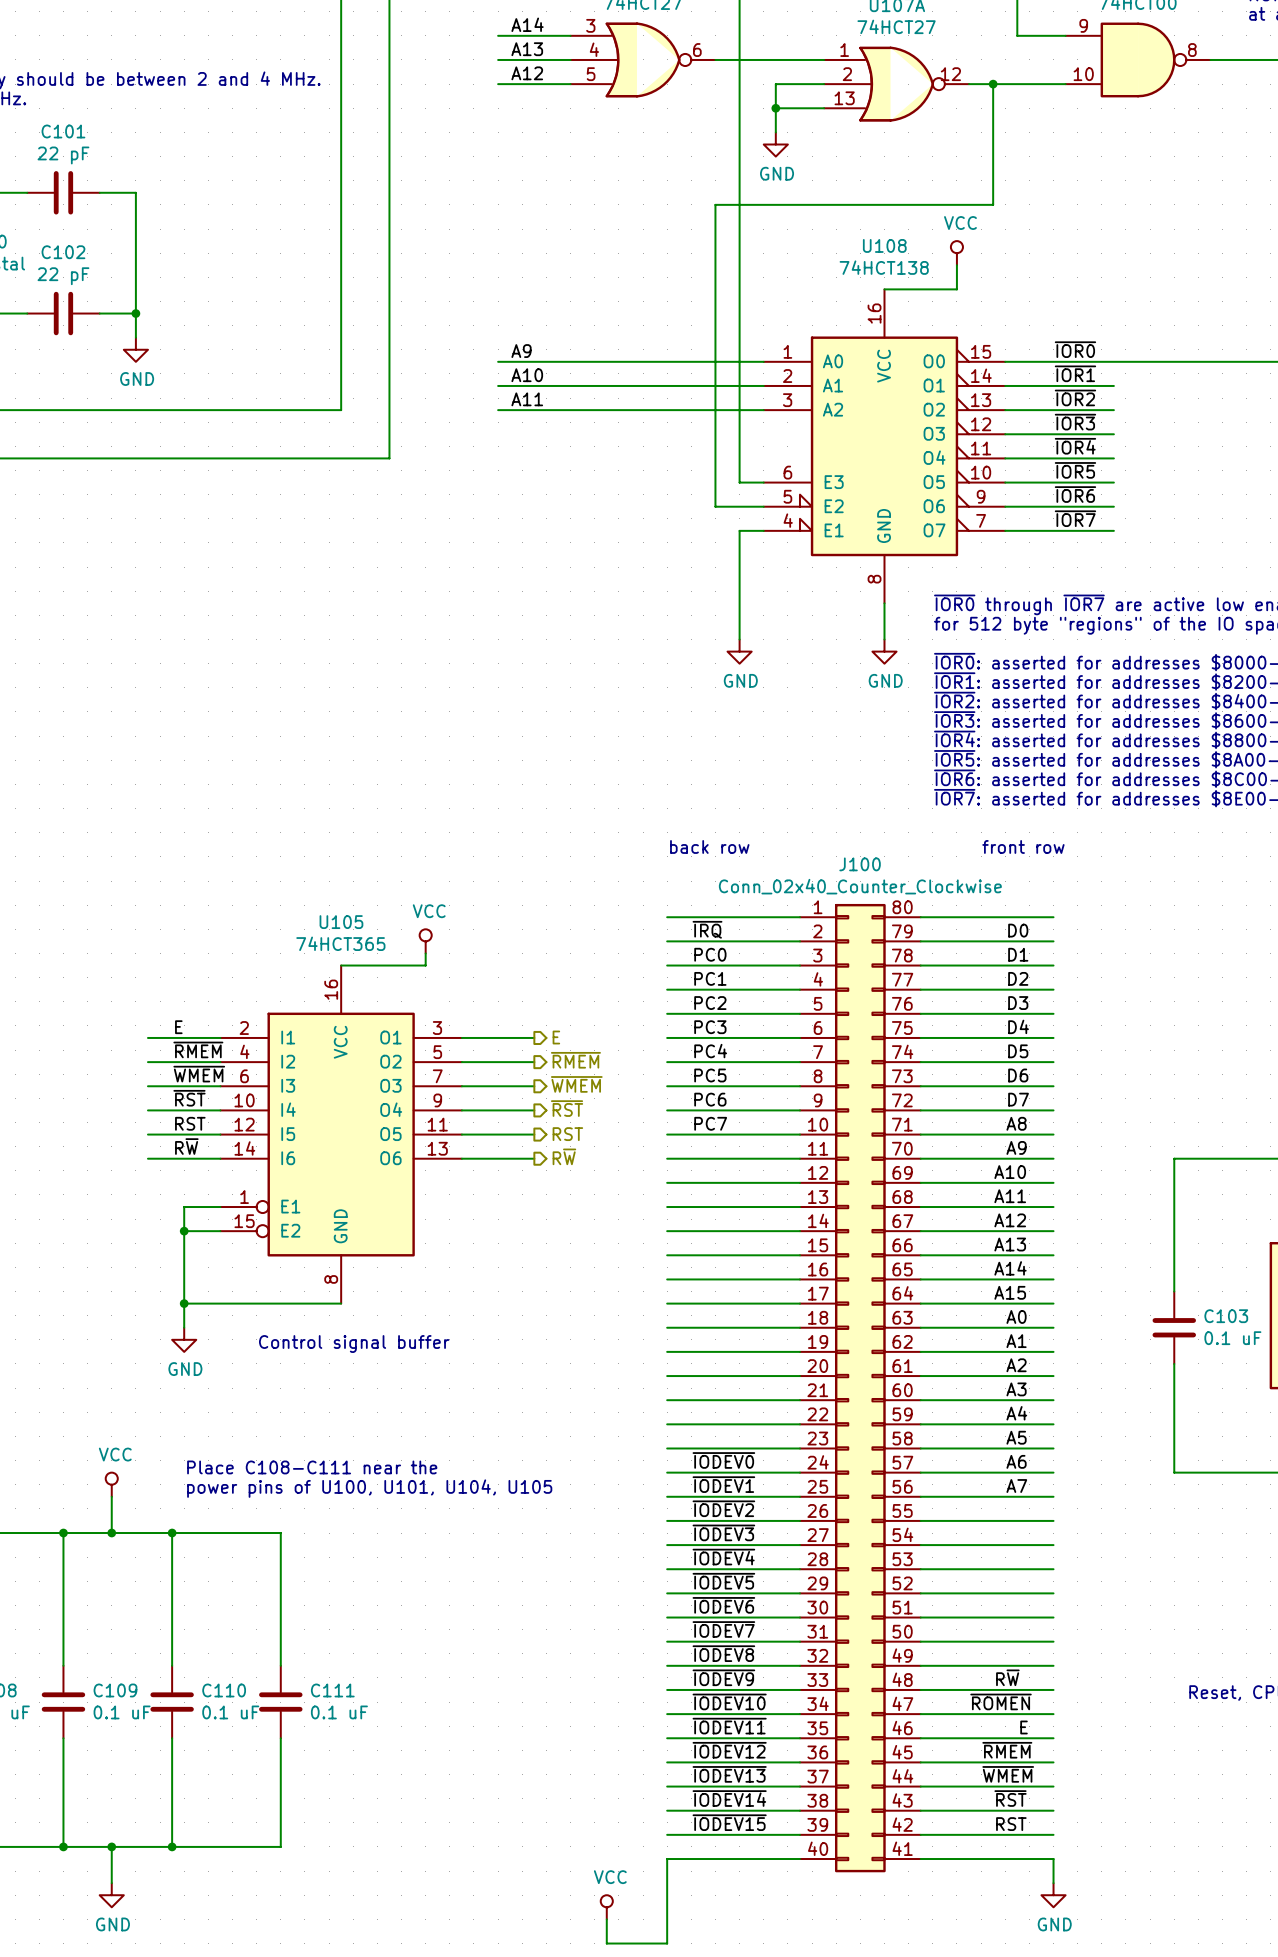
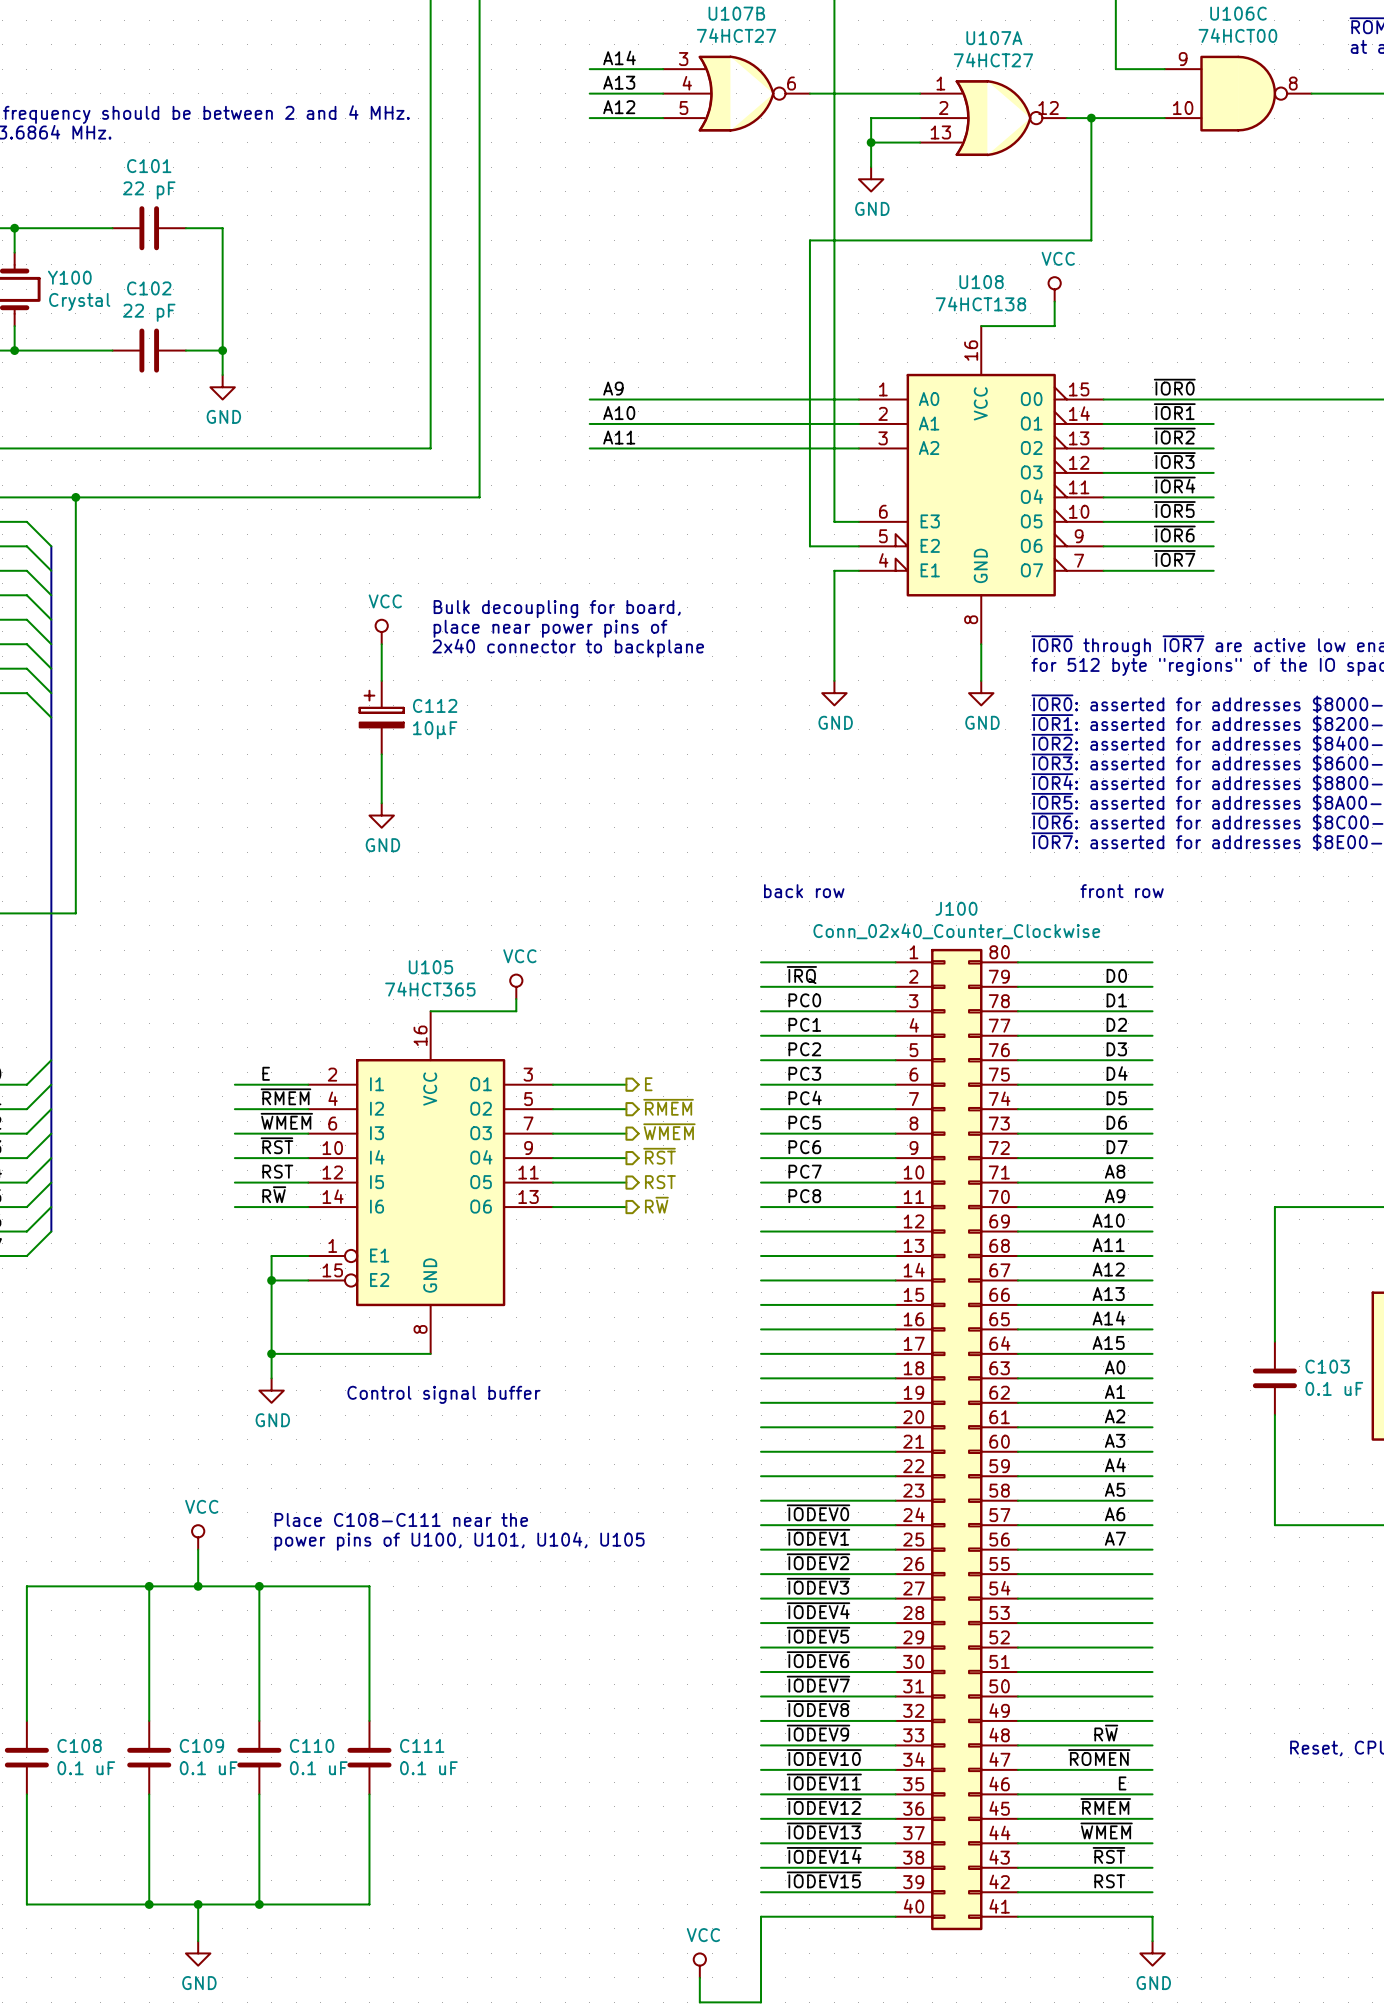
text: none -> Bulk decoupling for board, (557, 609)
text: none -> place near power pins of (550, 628)
power symbol: none -> VCC (381, 631)
wire: none -> (381, 644) (381, 680)
text: none -> 2x40 connector to backplane (568, 648)
C112: none -> 10μF (381, 717)
wire: none -> (381, 754) (381, 803)
power symbol: none -> GND (381, 815)
label: none -> PC8 (804, 1196)

